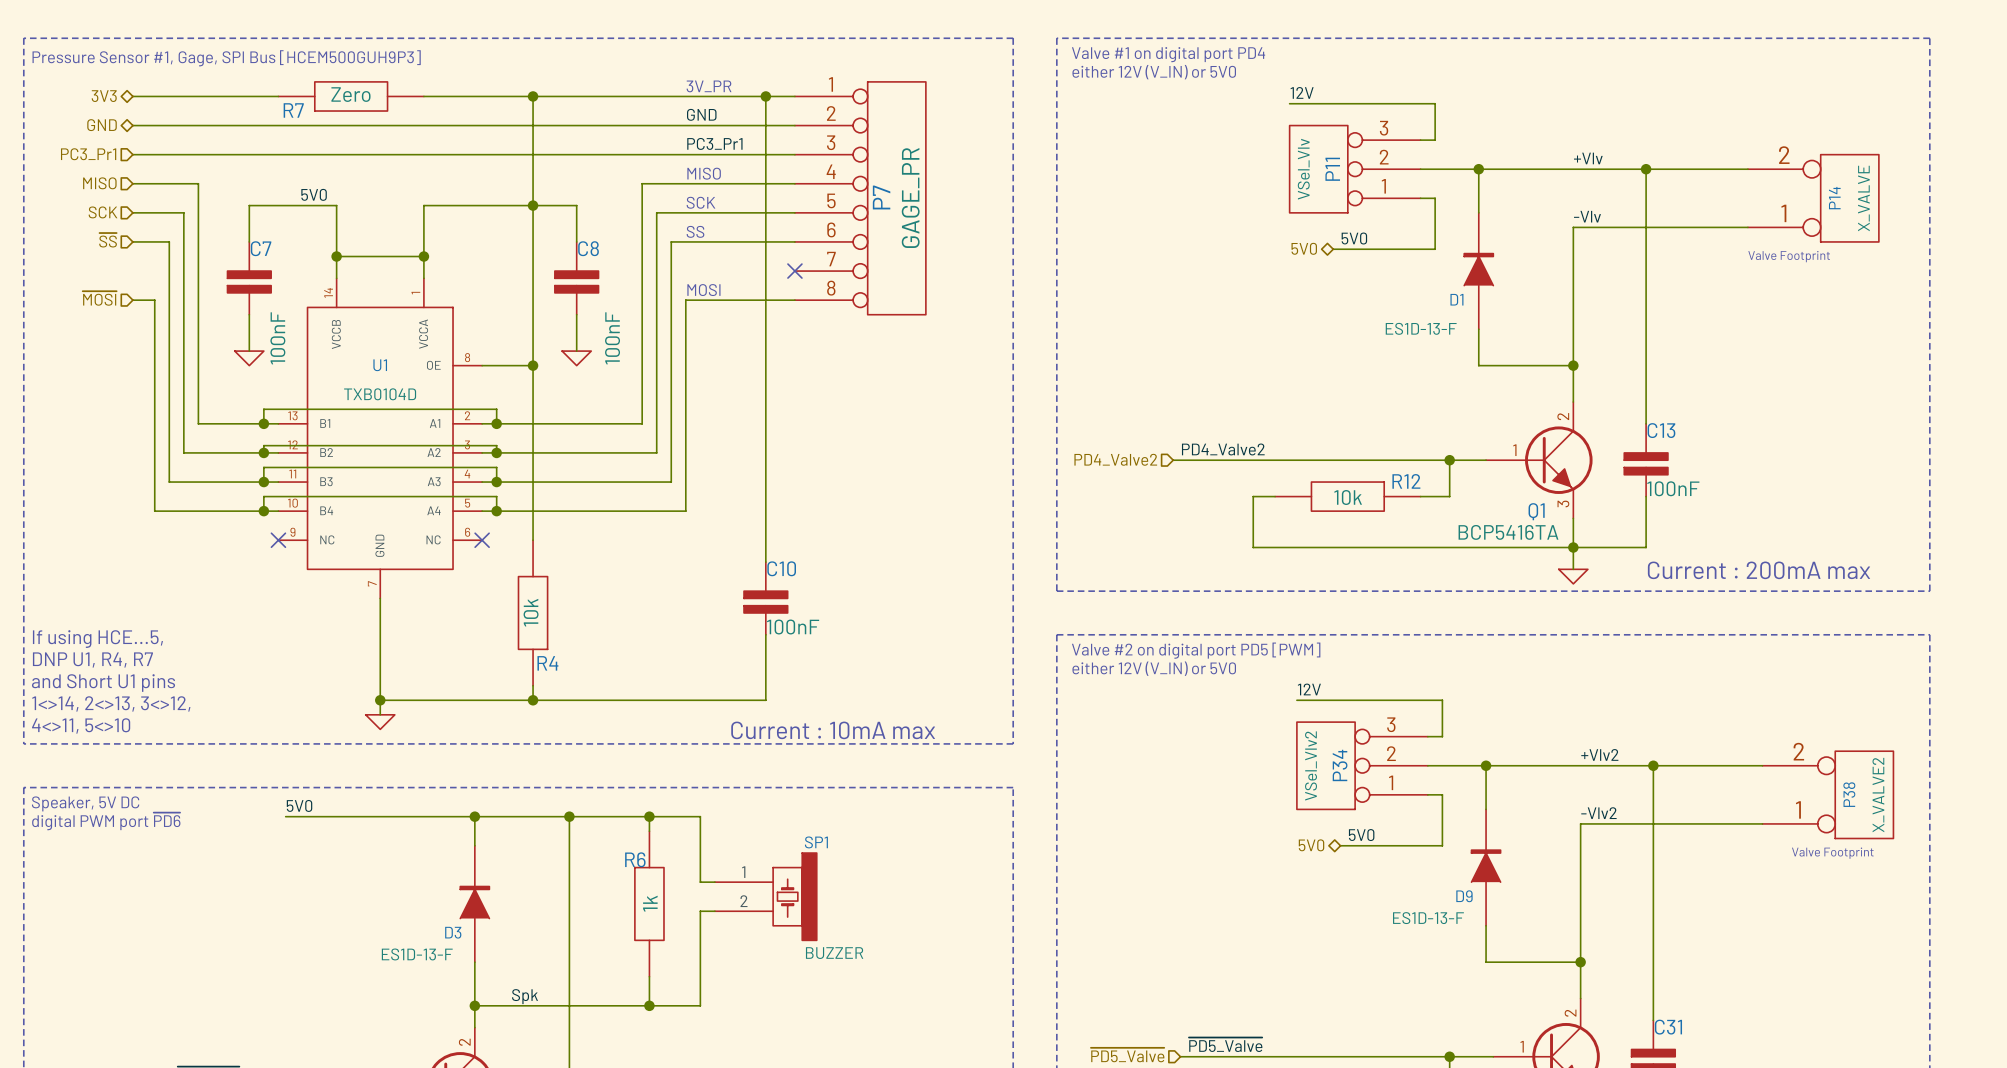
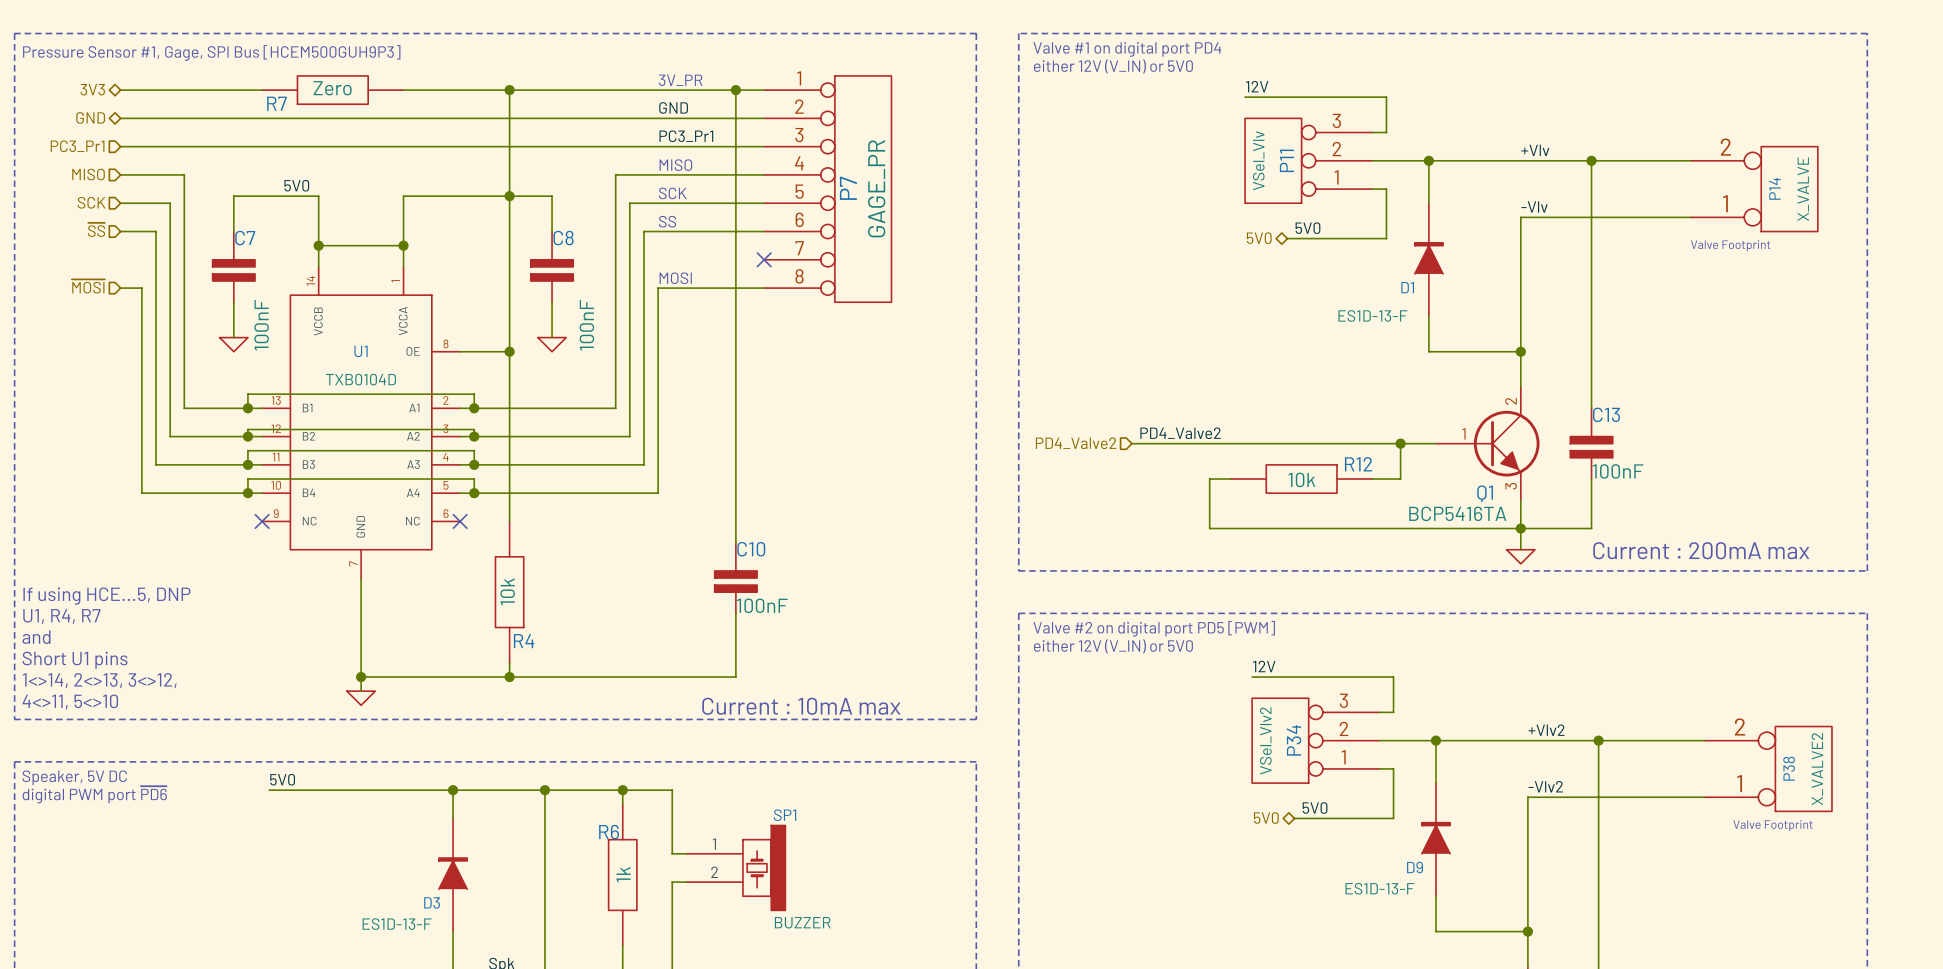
text: none -> If using HCE...5, DNP (106, 596)
text: If using HCE...5, (97, 639) -> U1, R4, R7 (61, 616)
text: DNP U1, R4, R7 (92, 659) -> and (36, 637)
text: and Short U1 pins (103, 683) -> Short U1 pins (75, 660)

